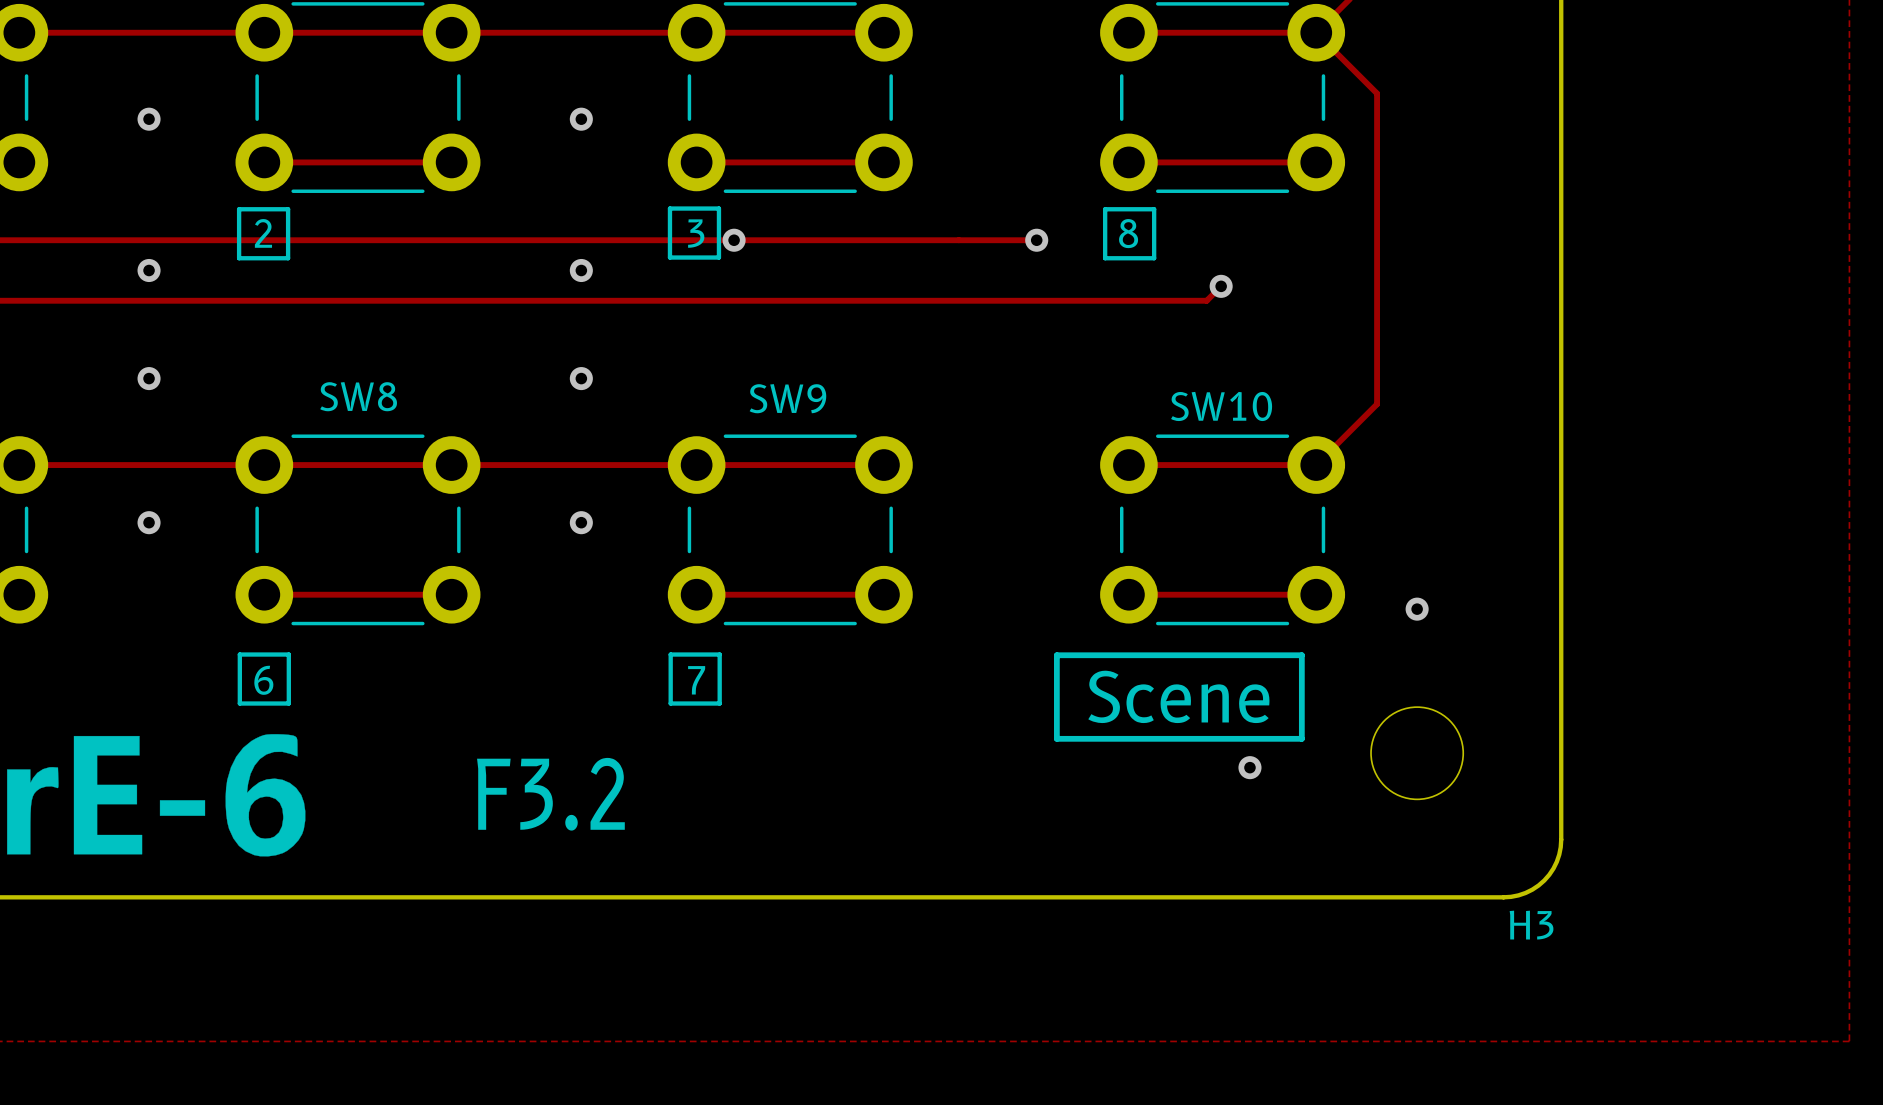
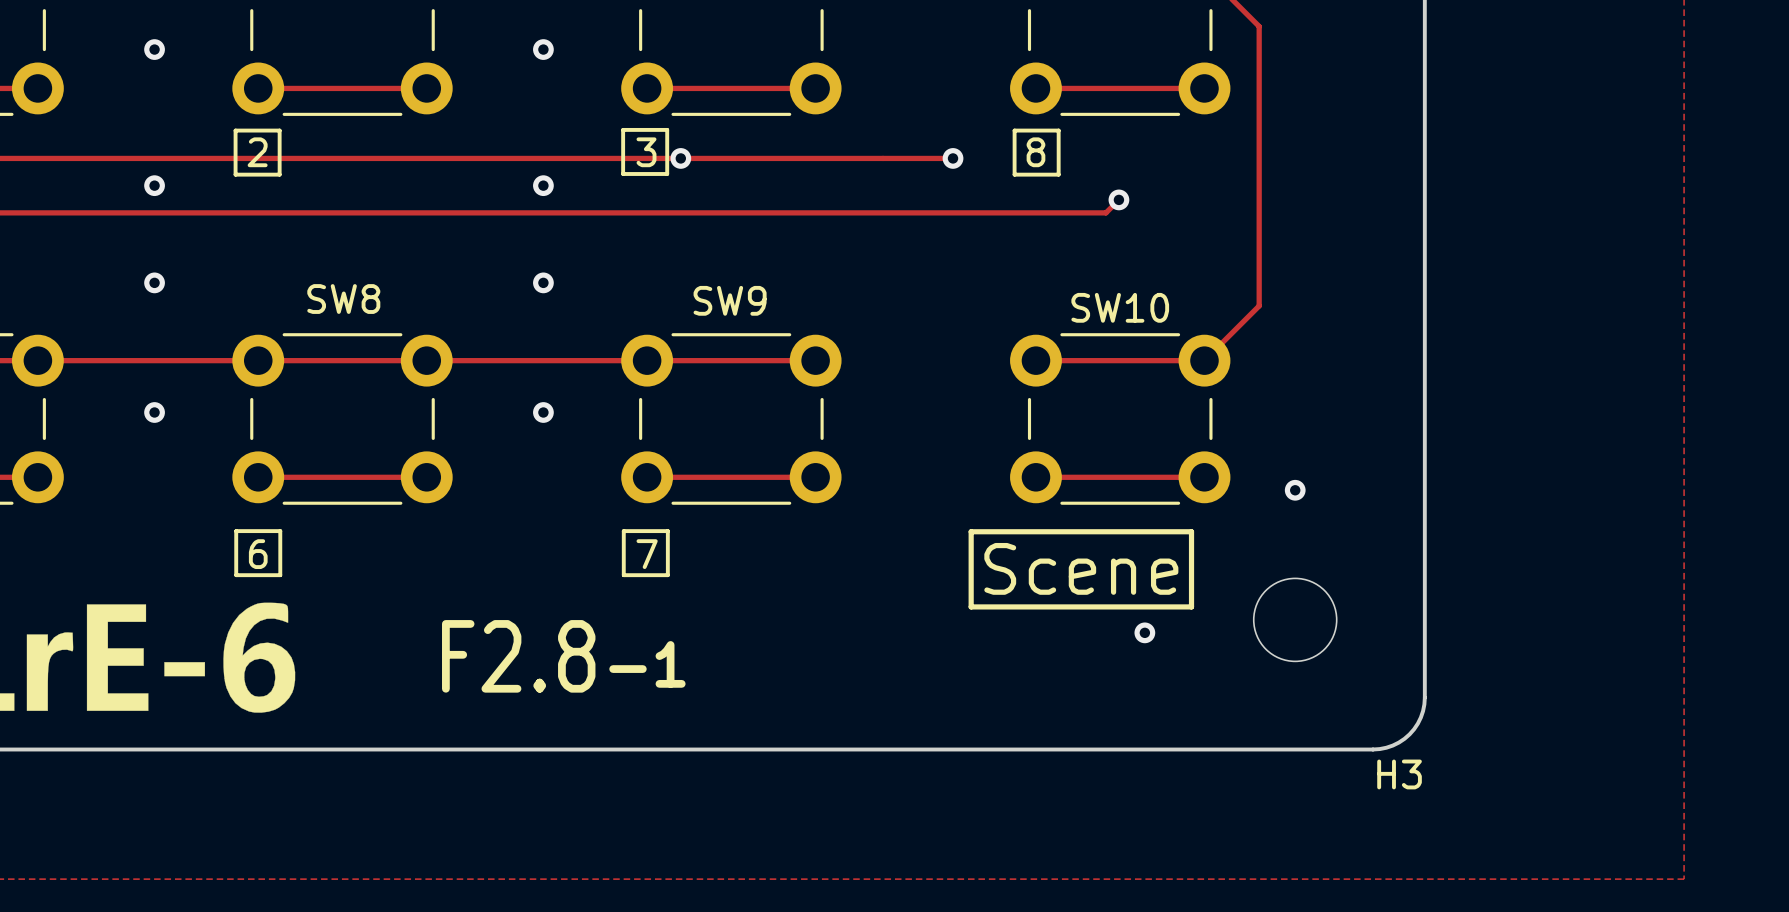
text: F3.2 (550, 794) -> F2.8 (518, 656)
text: none -> -1 (647, 664)

